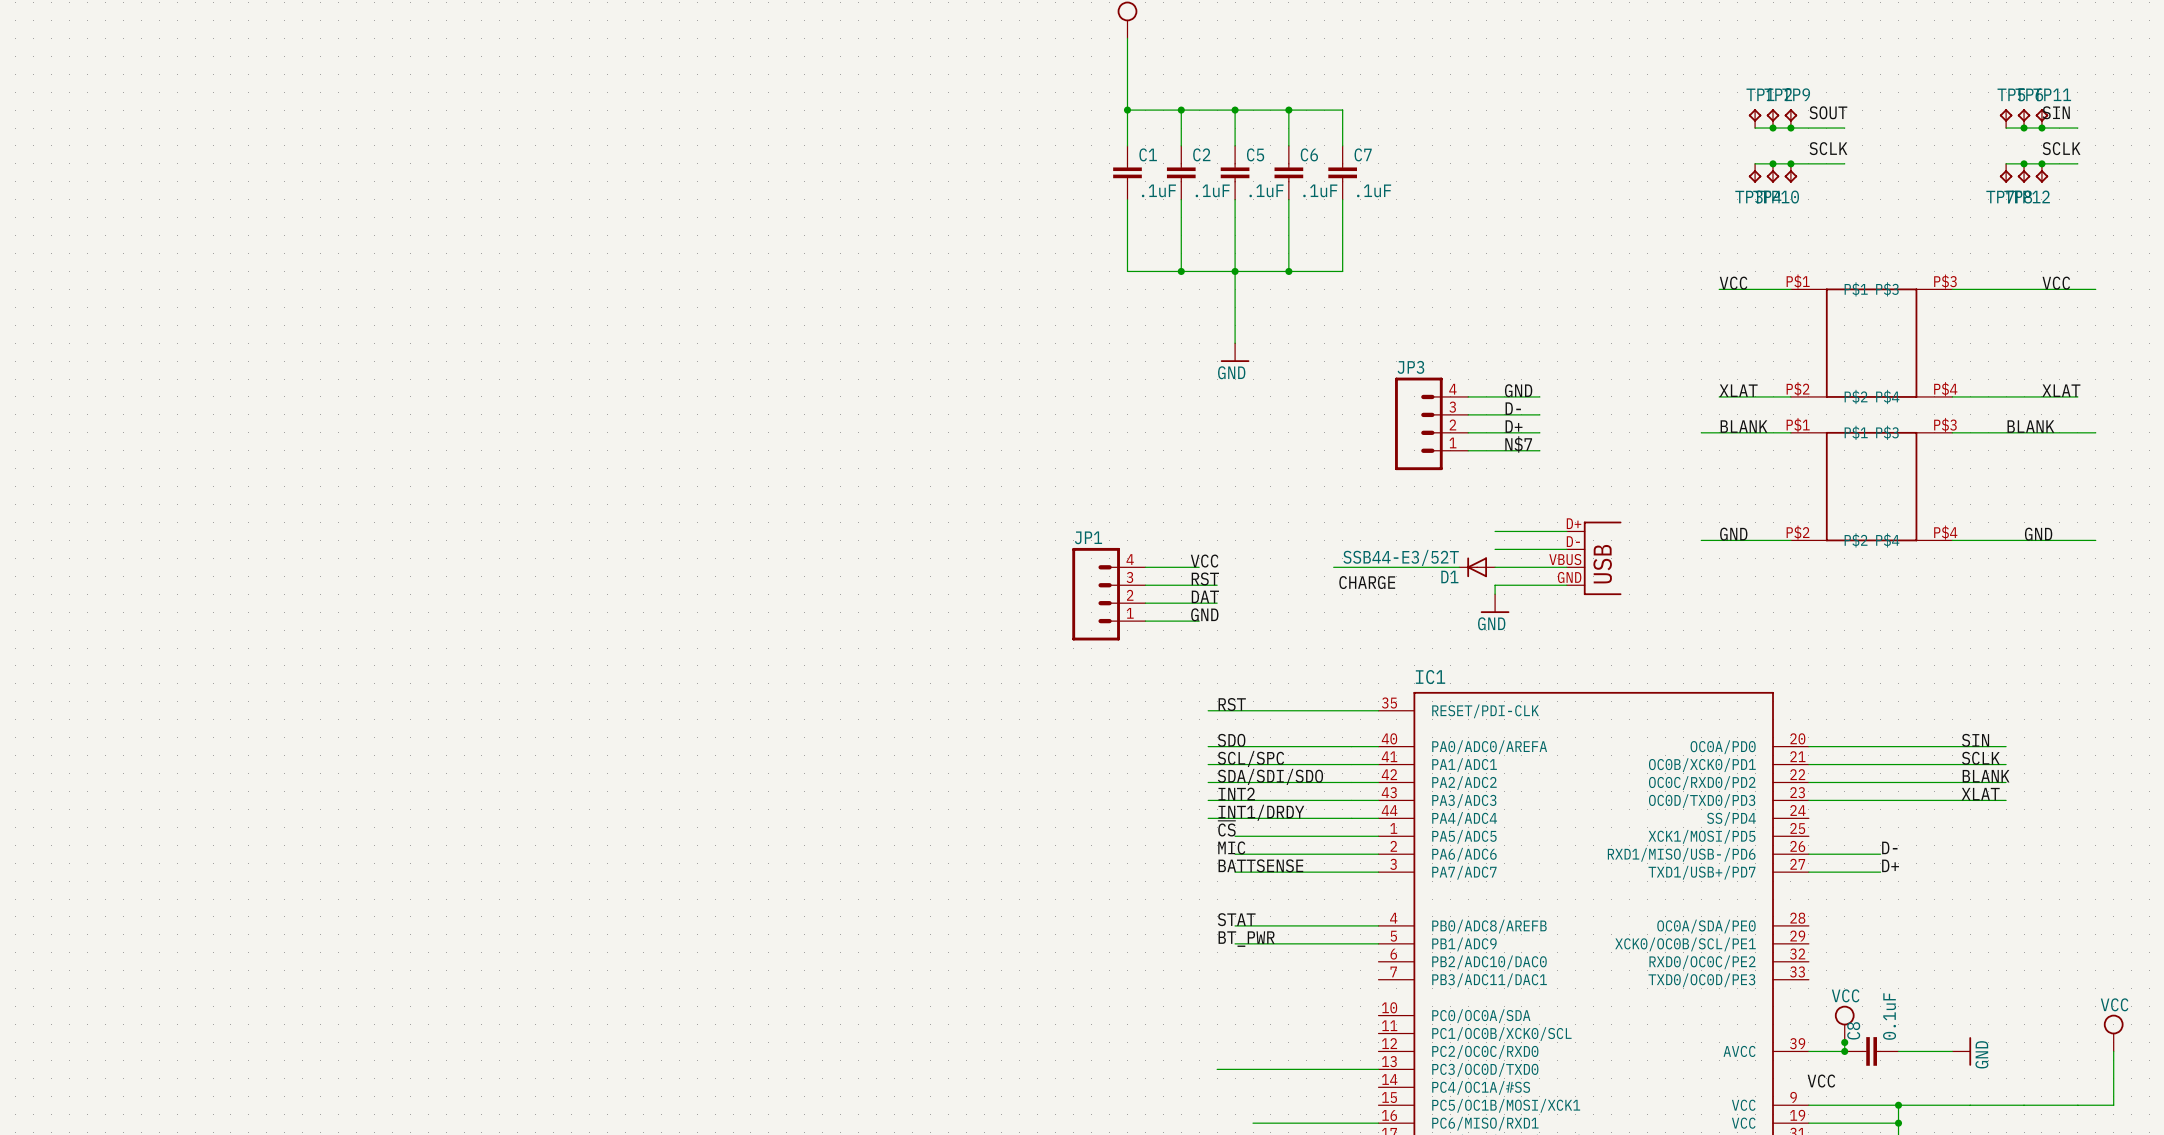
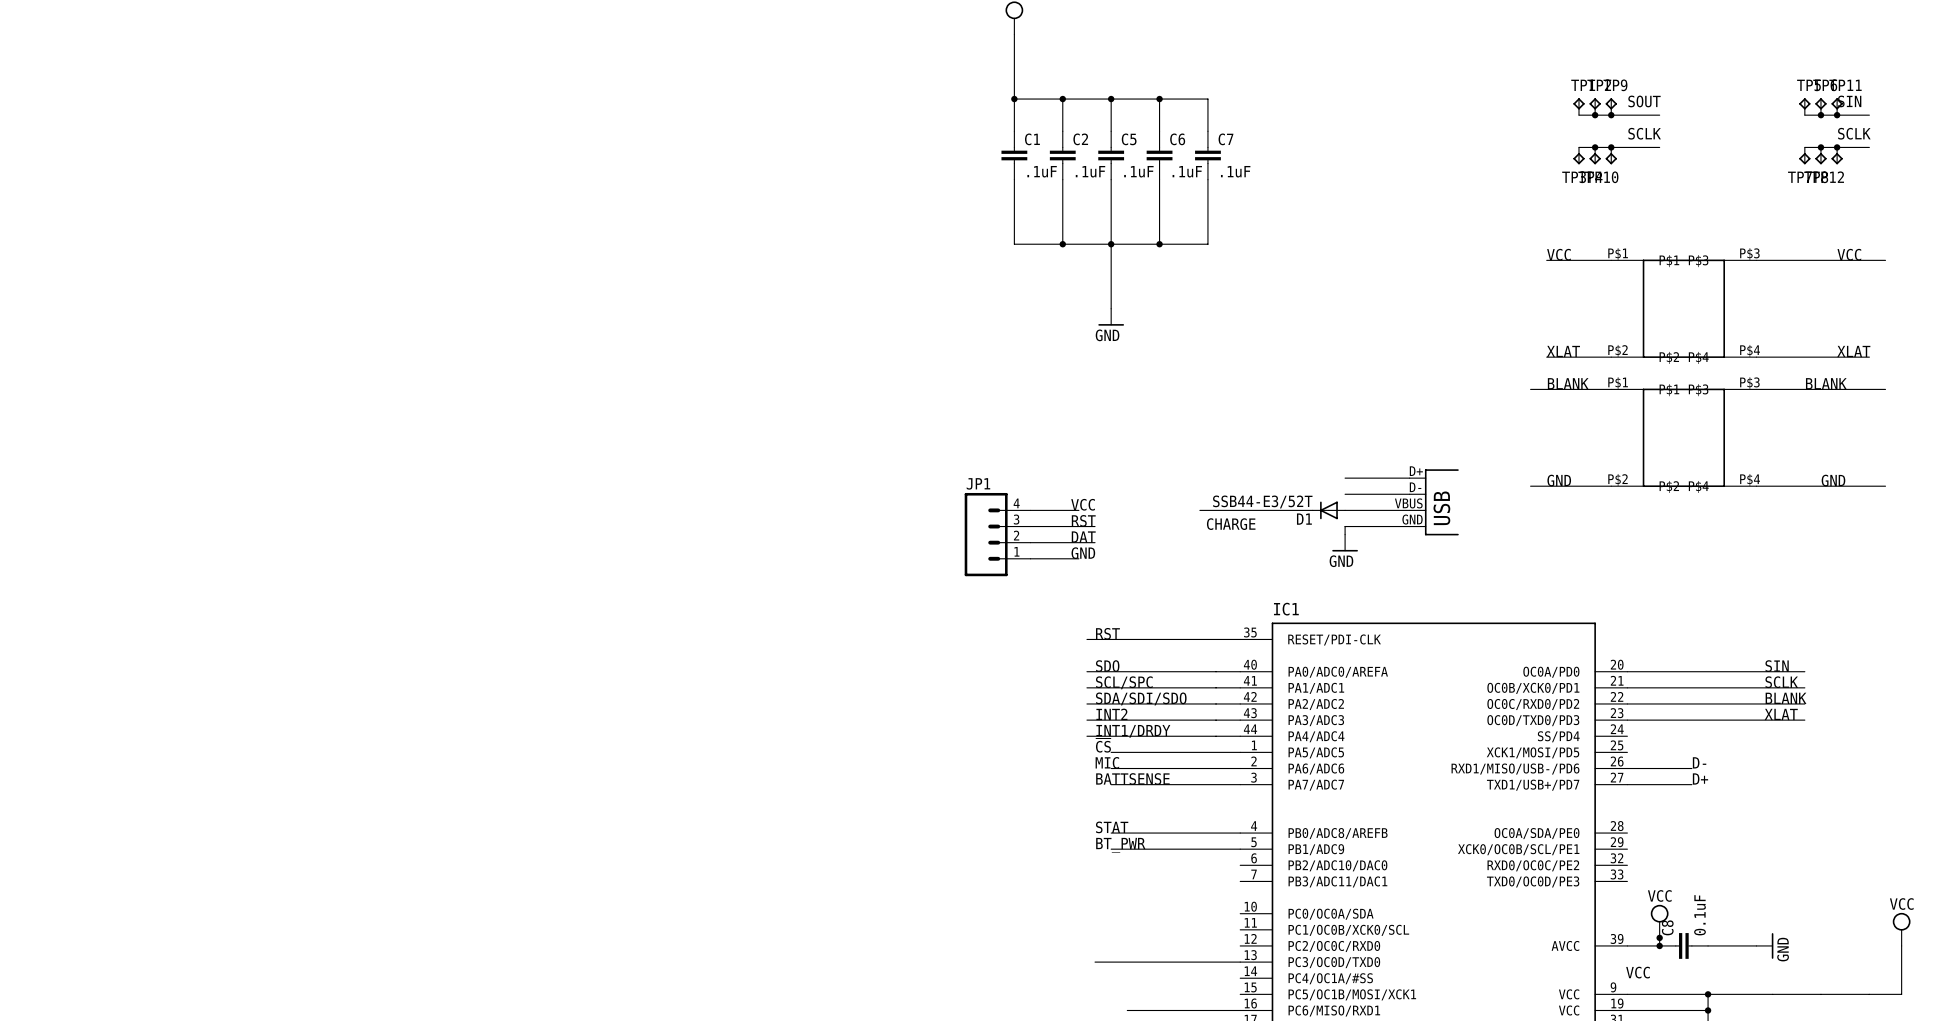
label: GND (1518, 390) -> none
wire: (1468, 396) (1539, 396) -> none
label: D- (1513, 408) -> none
wire: (1468, 414) (1539, 414) -> none
JP3: (1431, 423) -> none
label: D+ (1514, 426) -> none
wire: (1468, 432) (1539, 432) -> none
label: N$7 (1518, 444) -> none
wire: (1468, 450) (1539, 450) -> none

